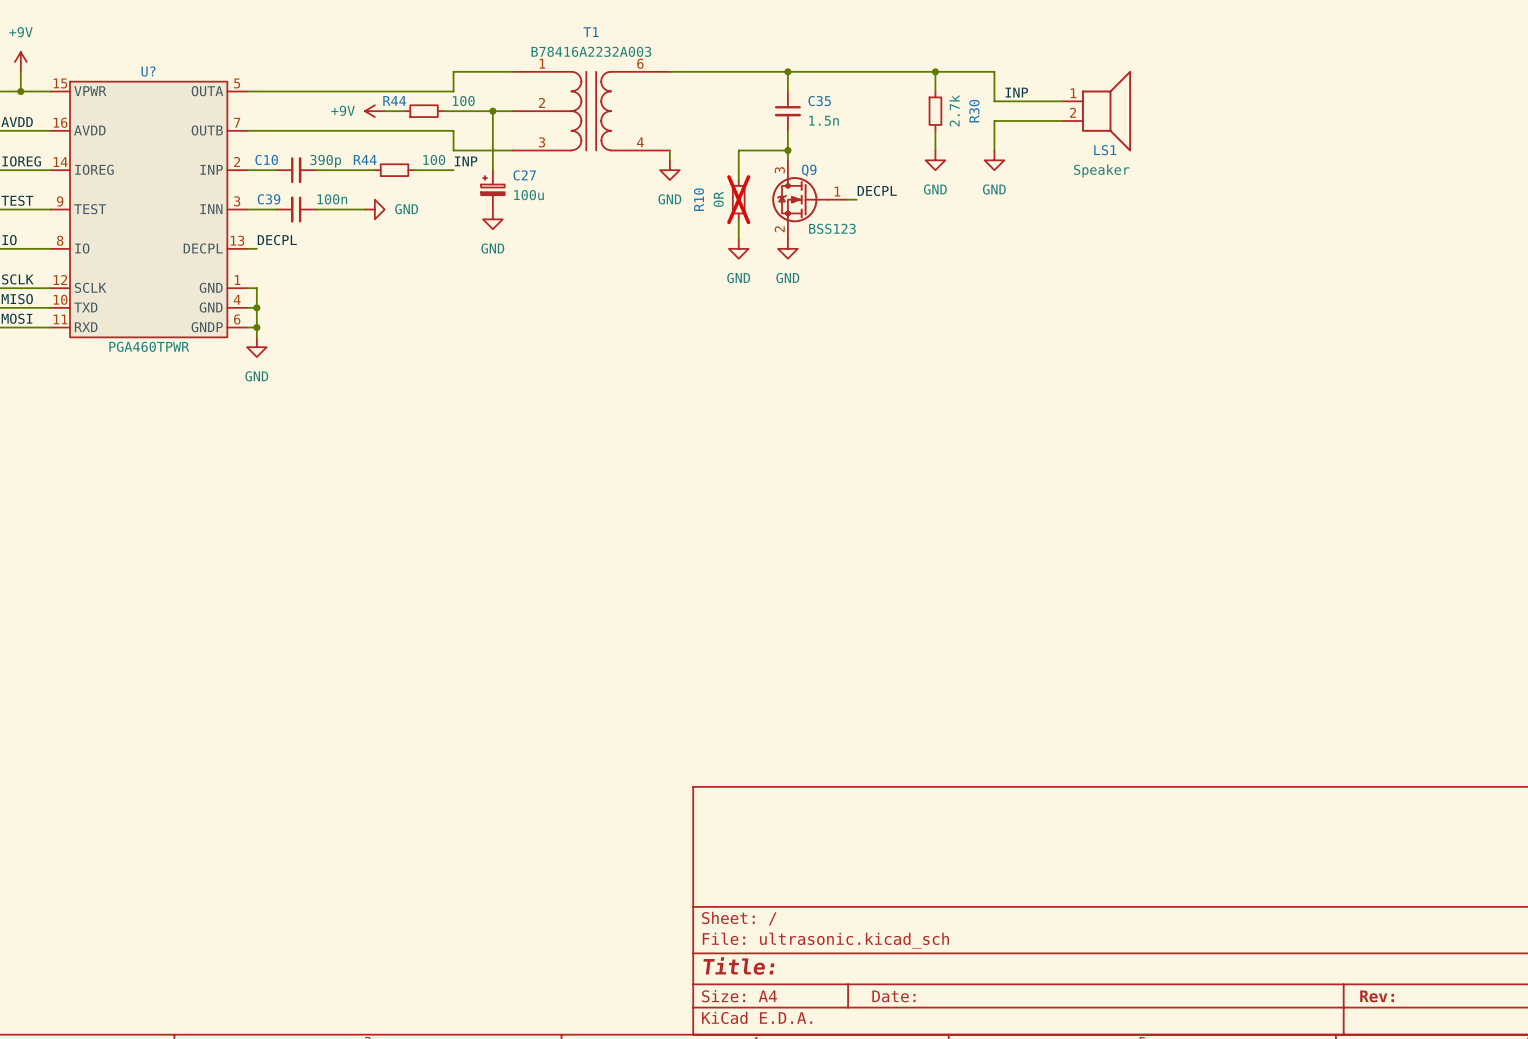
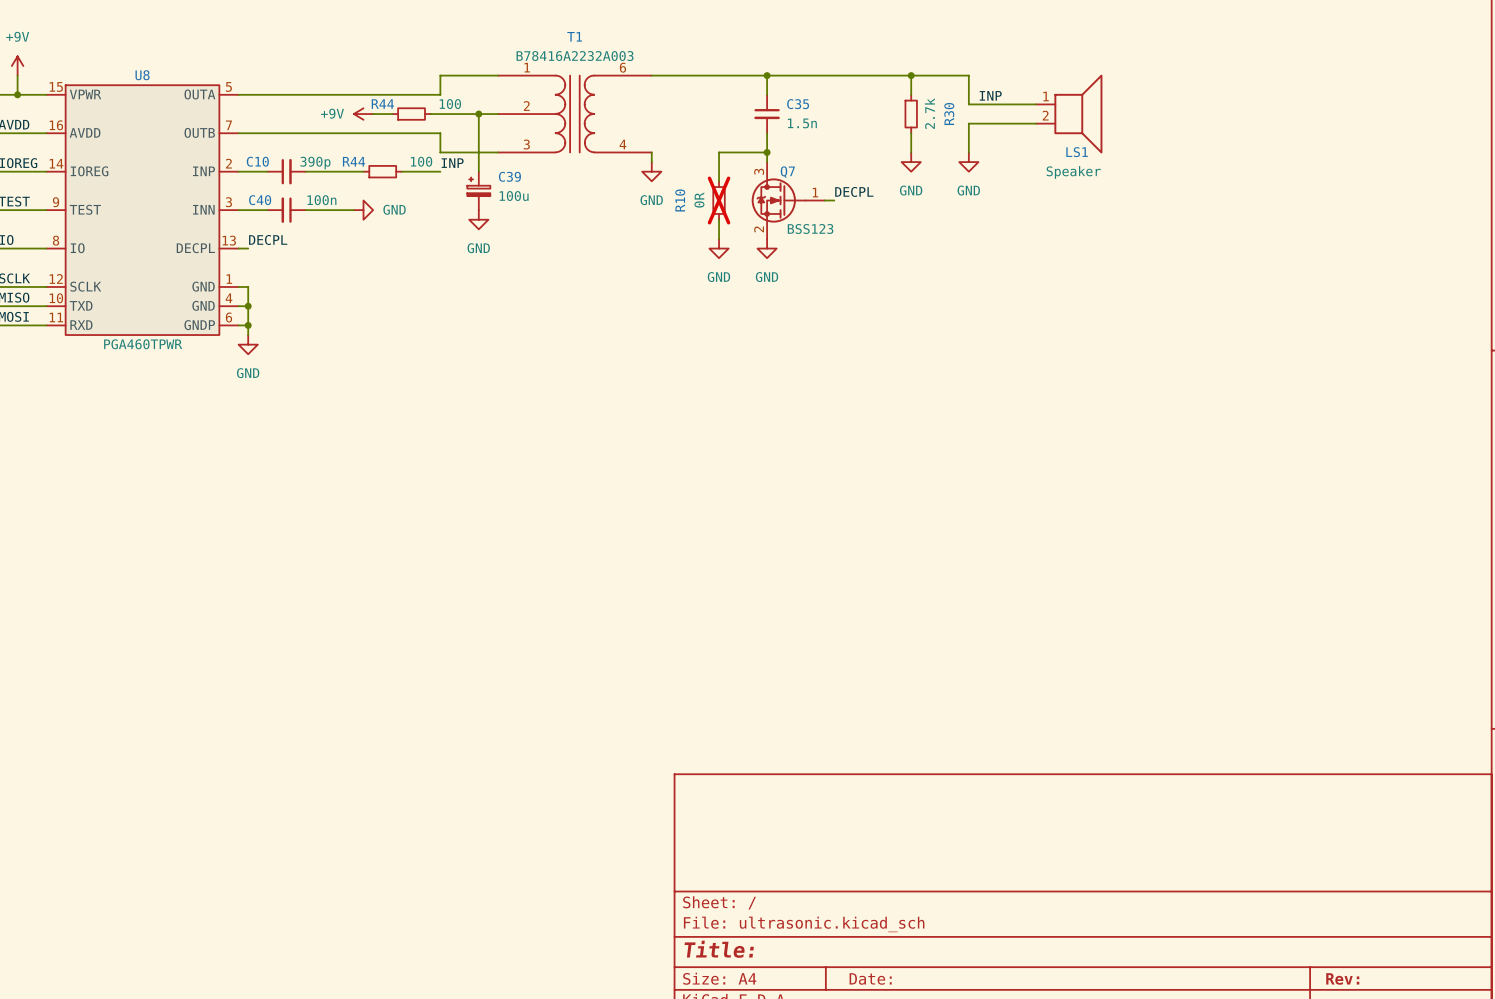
U? name: U? (148, 71) -> U8 (142, 75)
Q9 name: Q9 (809, 170) -> Q7 (787, 172)
C27 name: C27 (524, 175) -> C39 (509, 176)
C39 name: C39 (269, 199) -> C40 (260, 200)

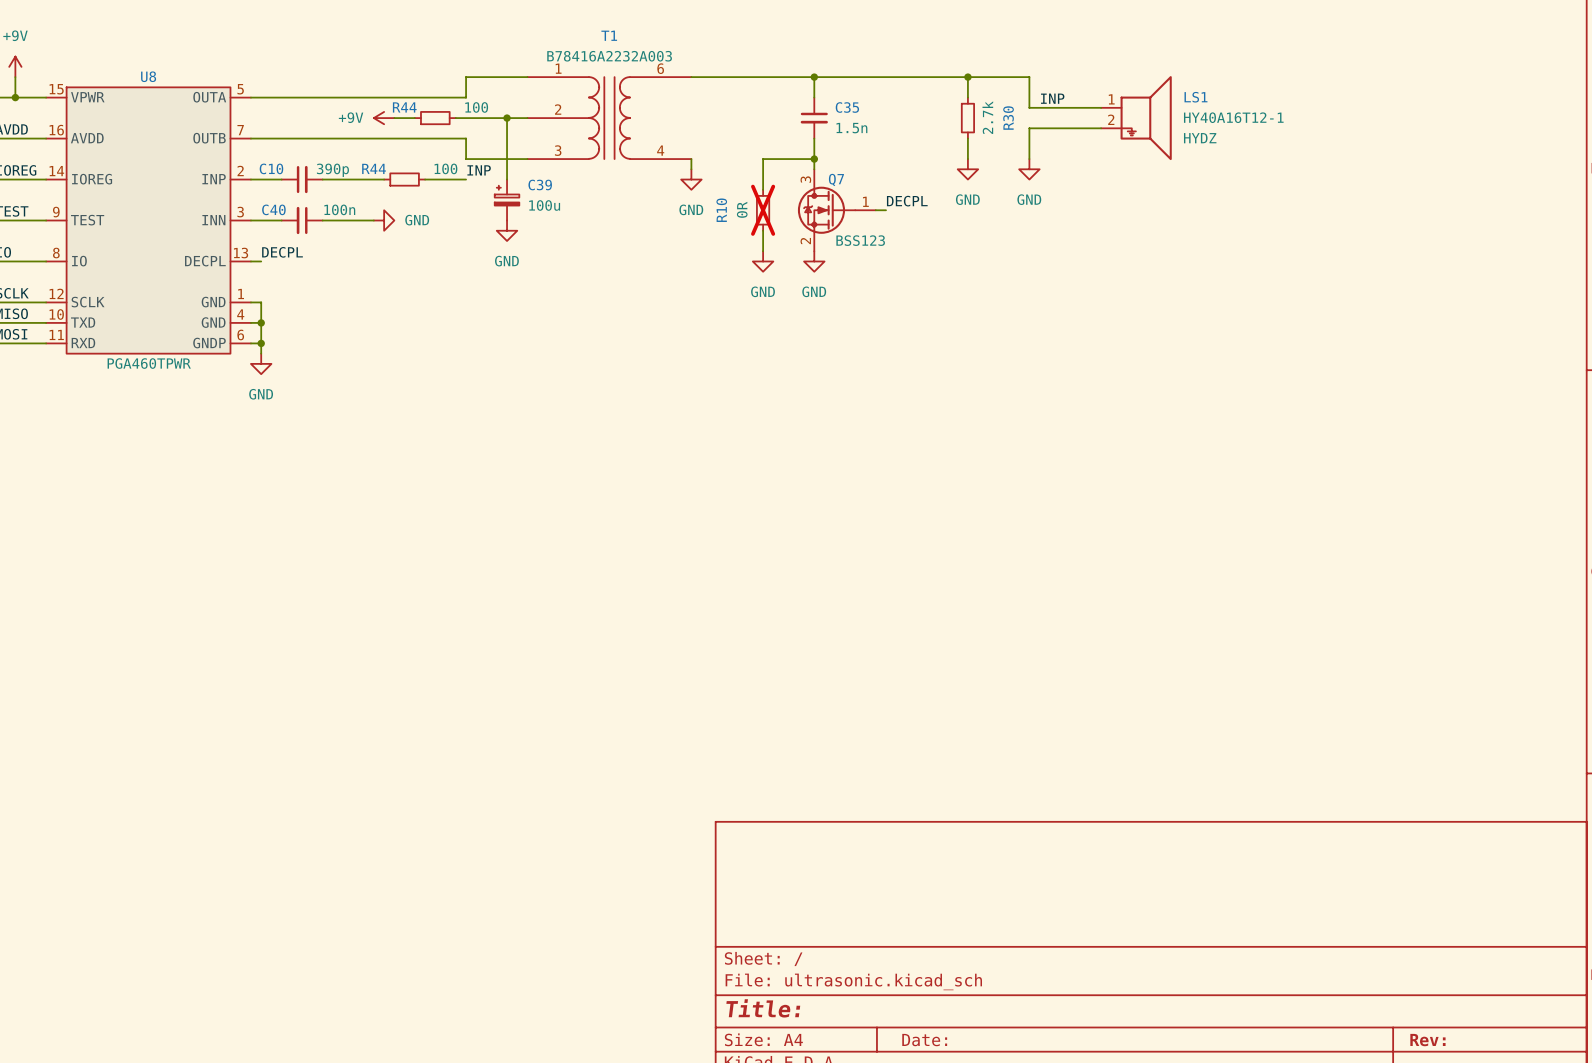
LS1 symbol: [1036, 74, 1103, 154] -> [1101, 76, 1172, 161]
LS1 text: none -> HYDZ (1200, 138)
LS1 name position: LS1 (1077, 152) -> LS1 (1195, 97)
LS1 value: Speaker (1073, 172) -> HY40A16T12-1 (1233, 117)

